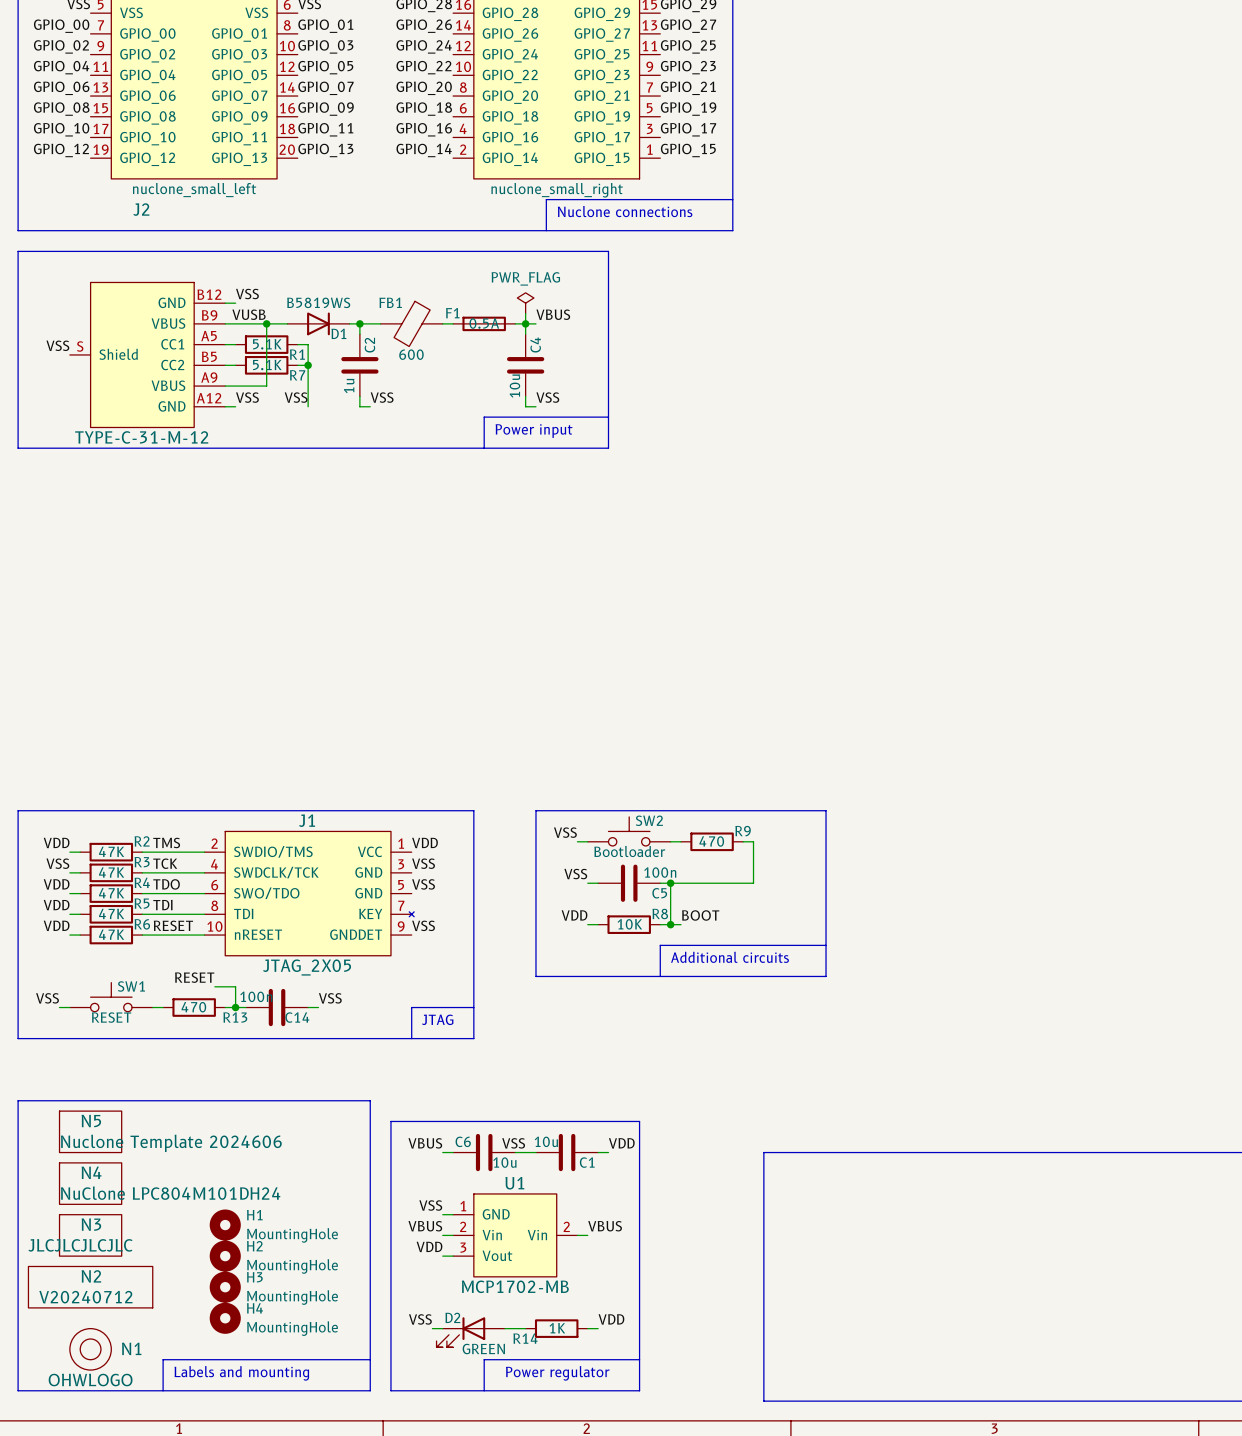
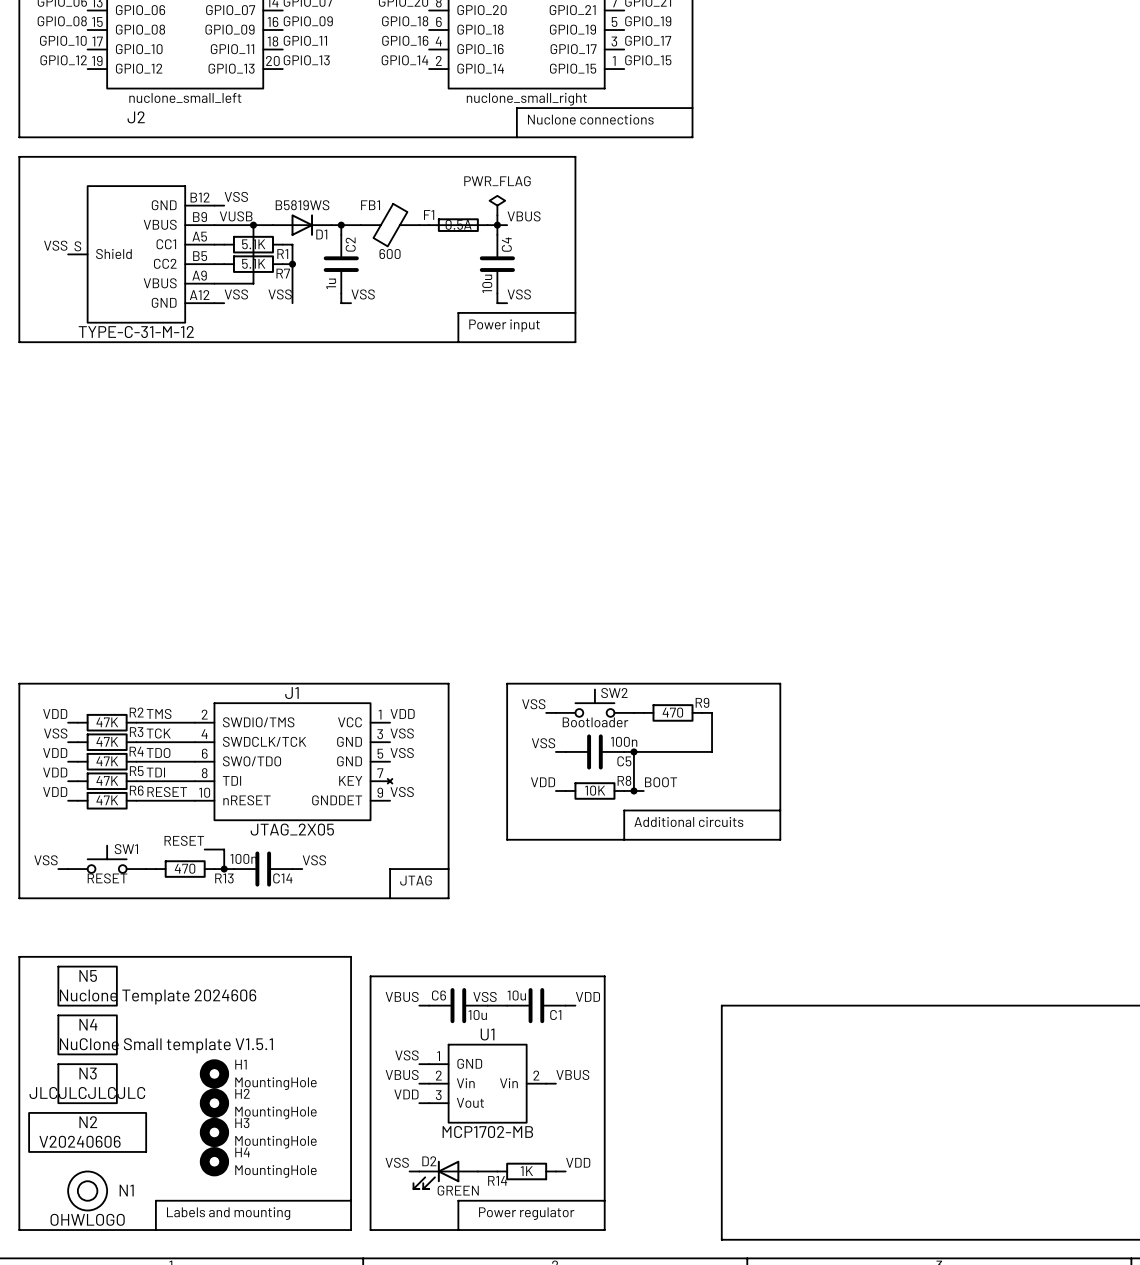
N4 value: NuClone LPC804M101DH24 (170, 1193) -> NuClone Small template V1.5.1 (166, 1045)
N2 value: V20240712 (85, 1297) -> V20240606 (80, 1141)

